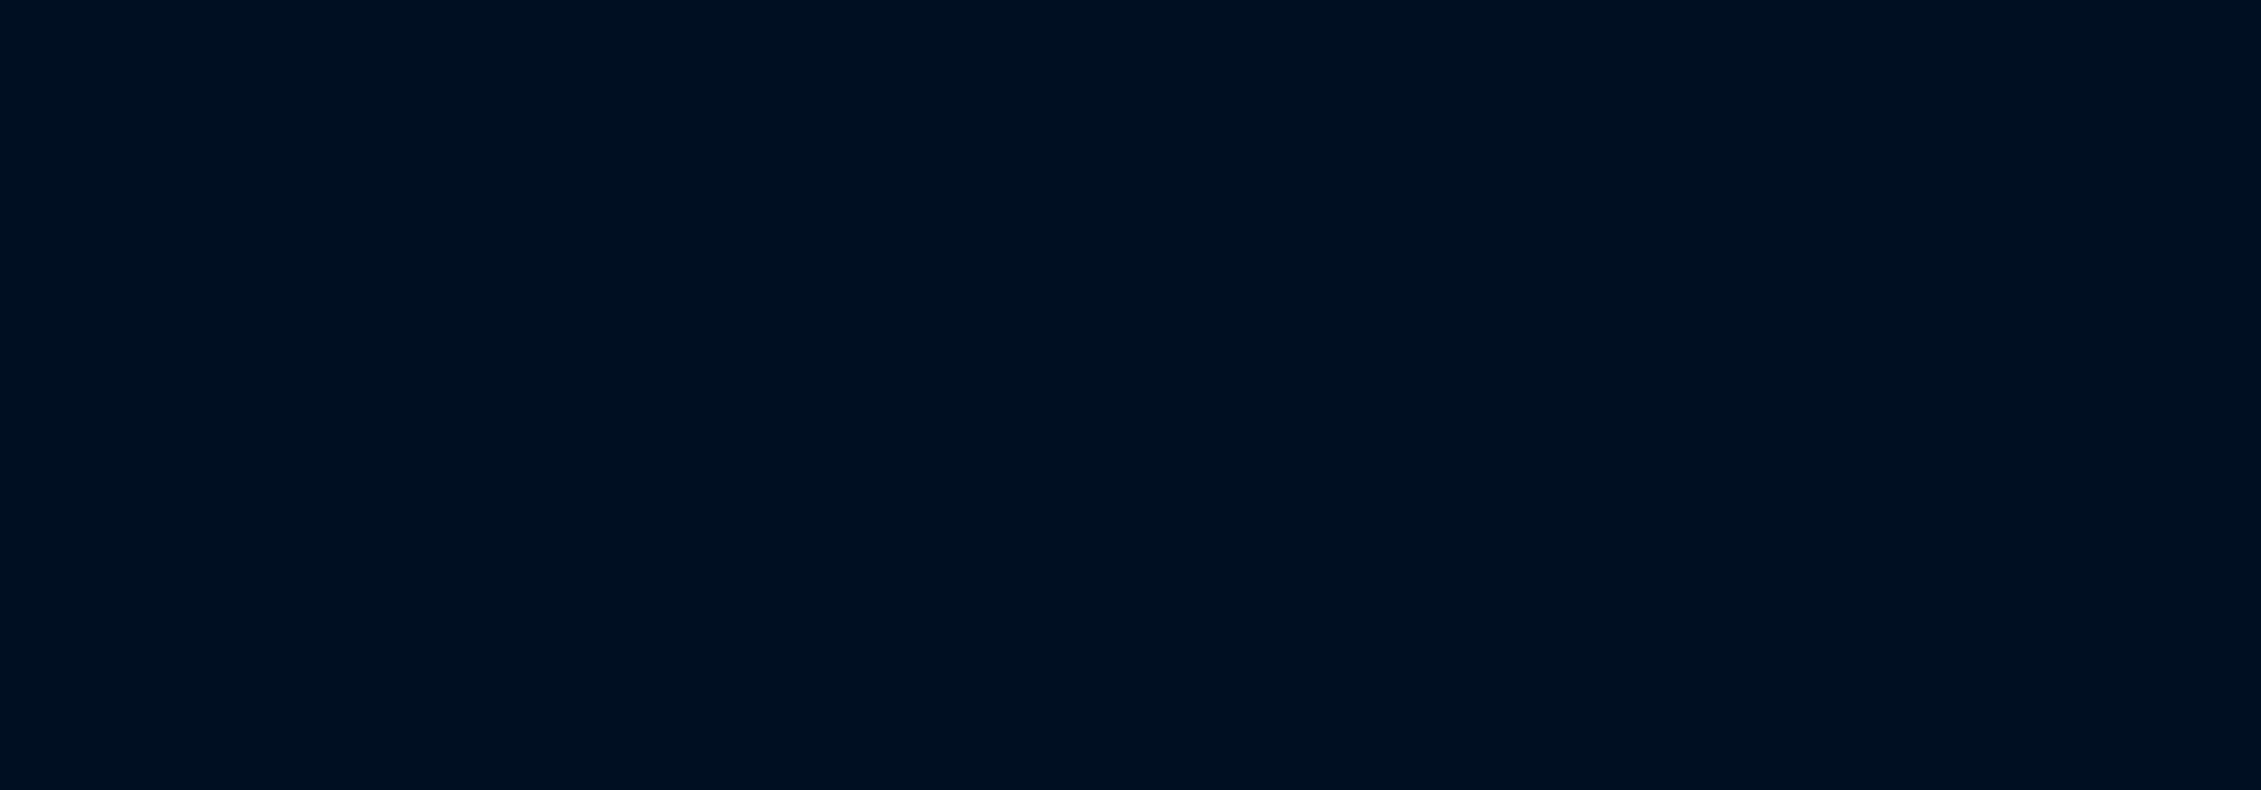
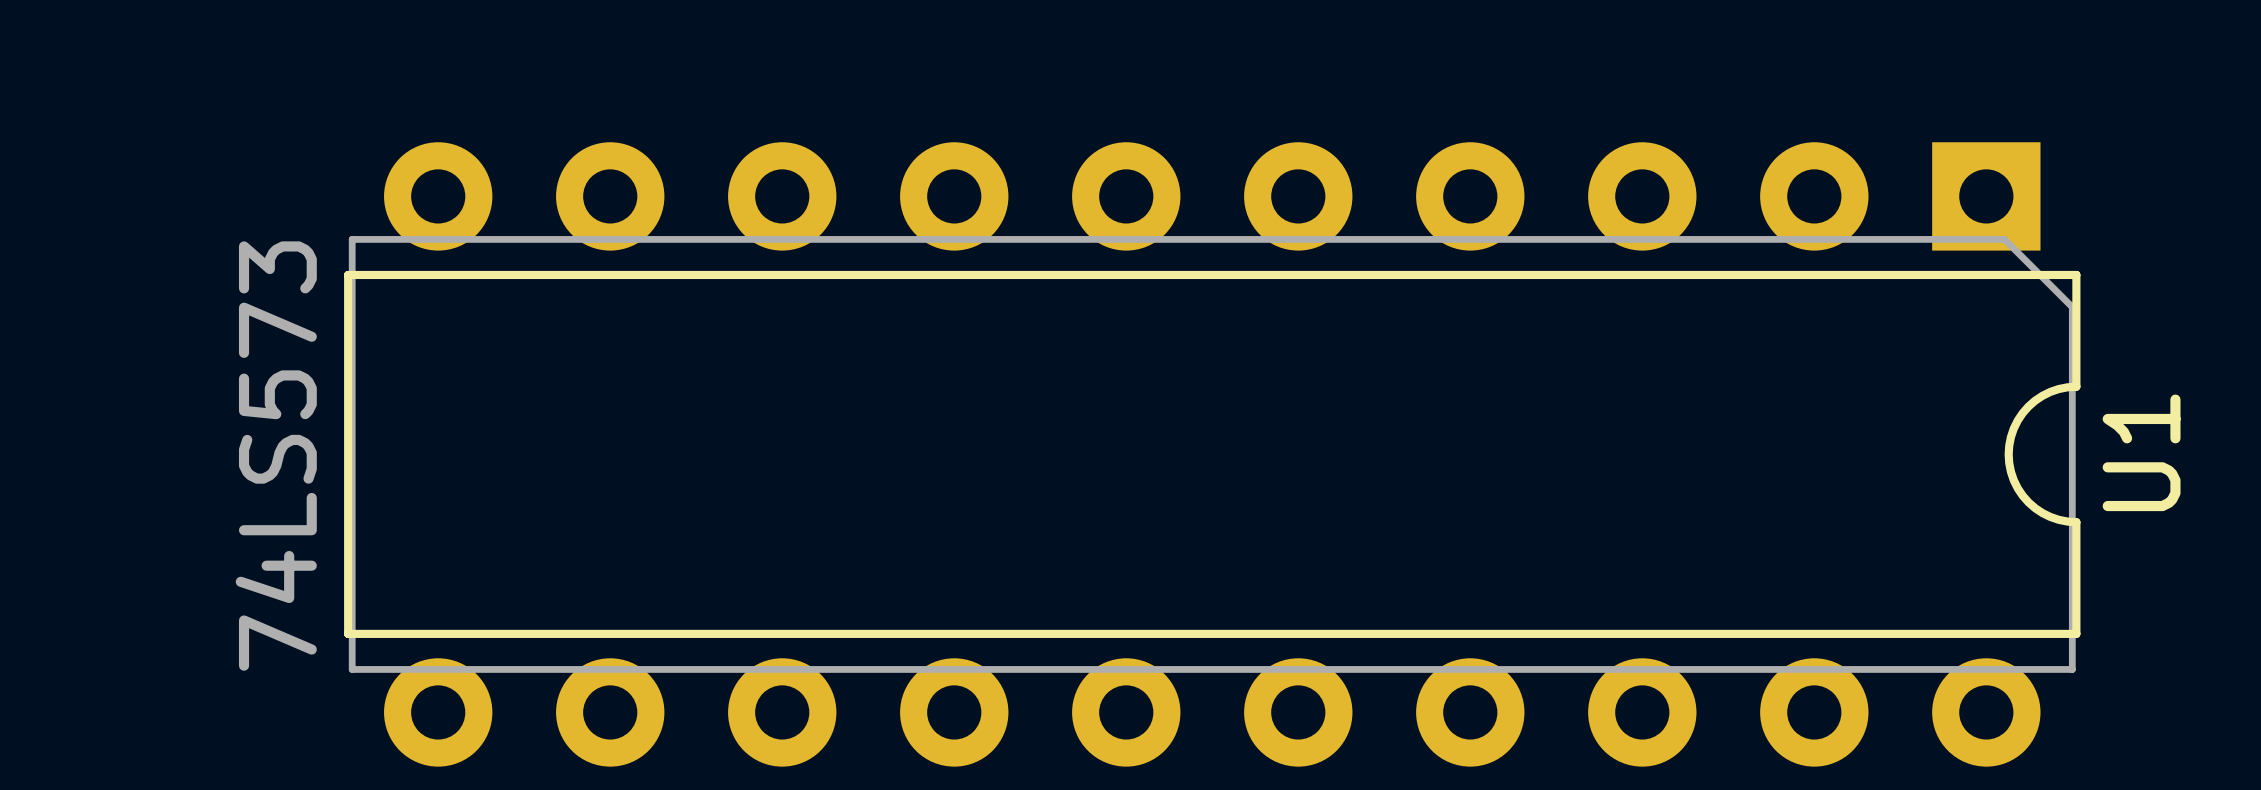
U1: none -> 74LS573 (1212, 454)

